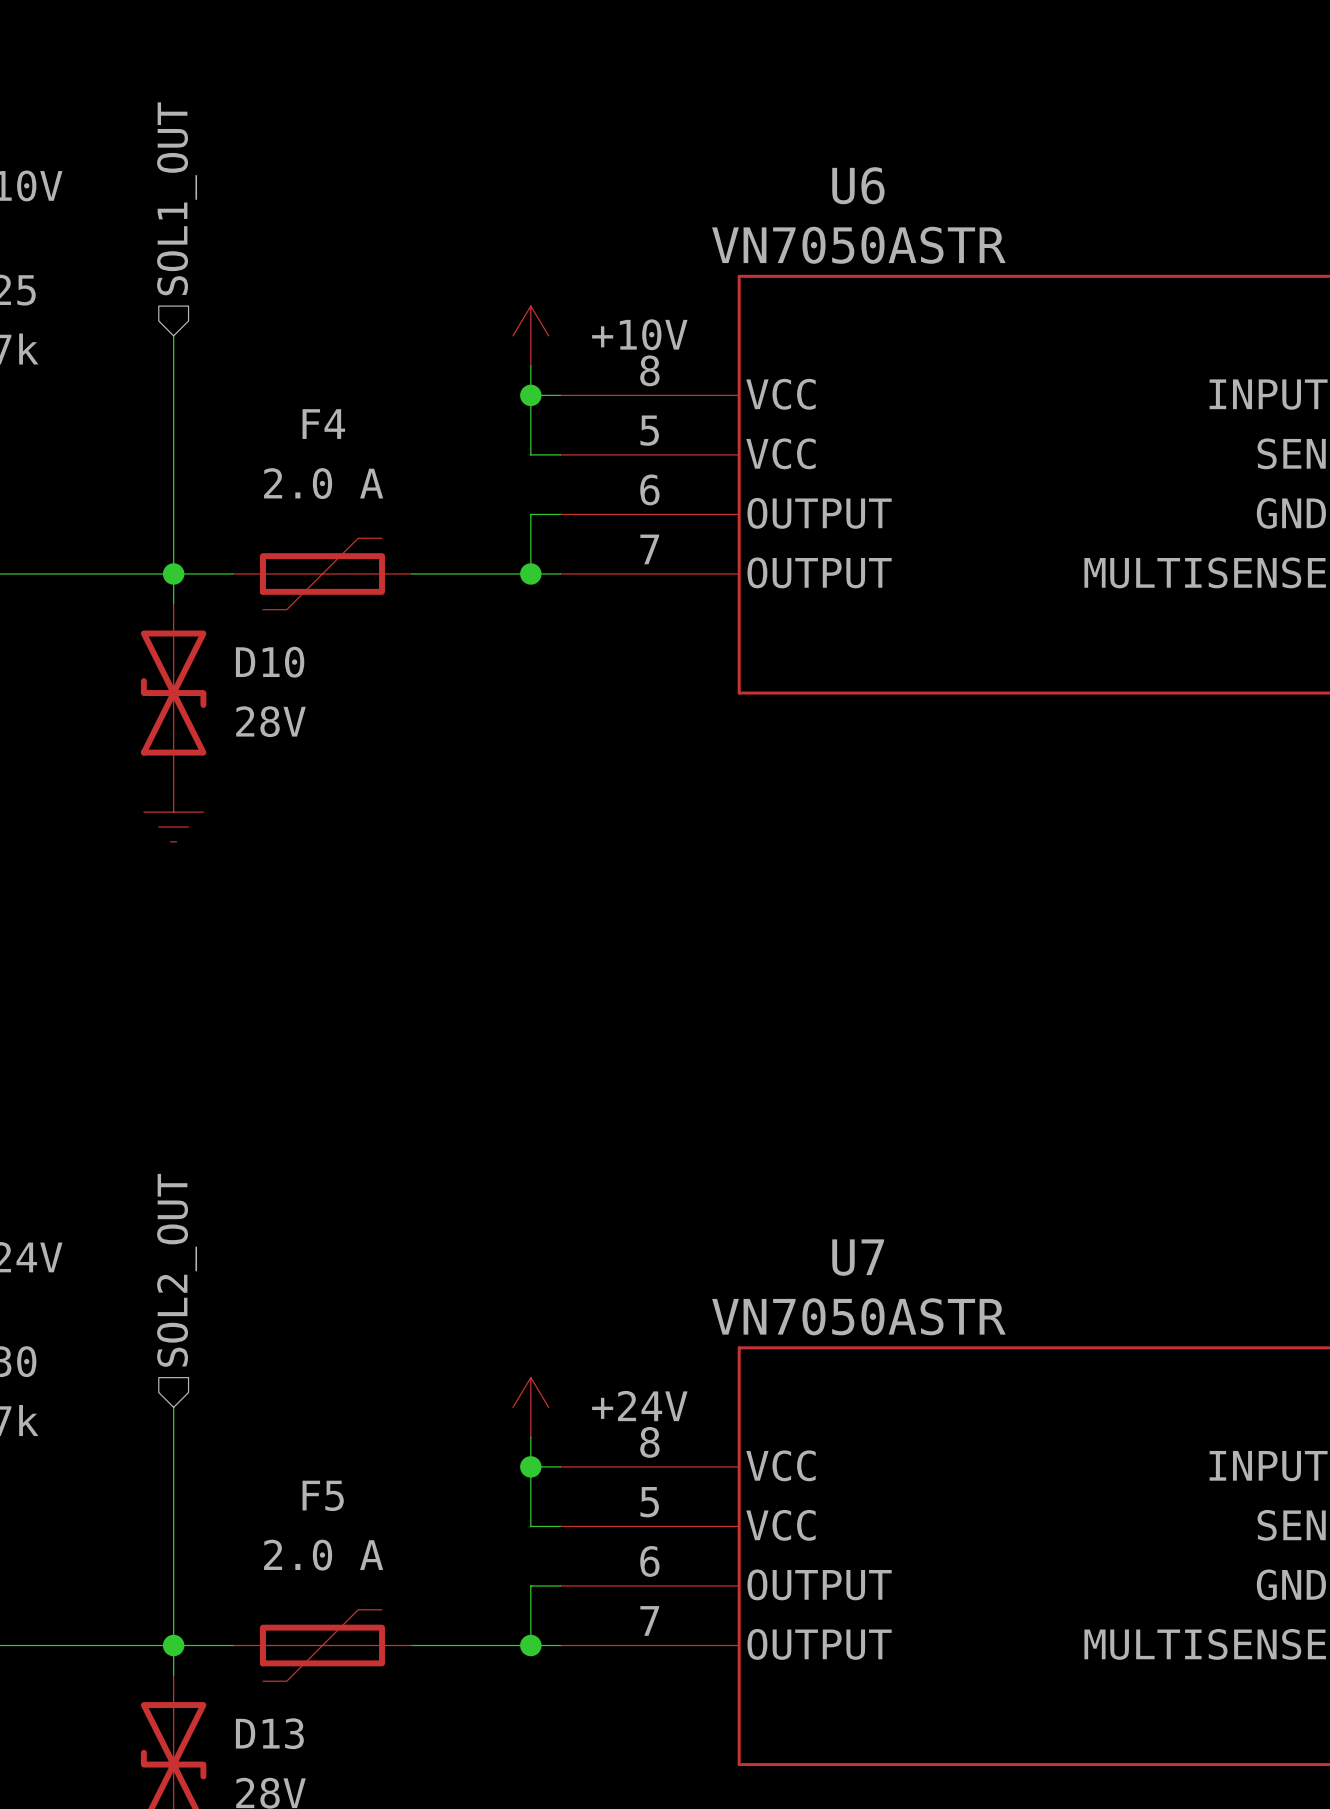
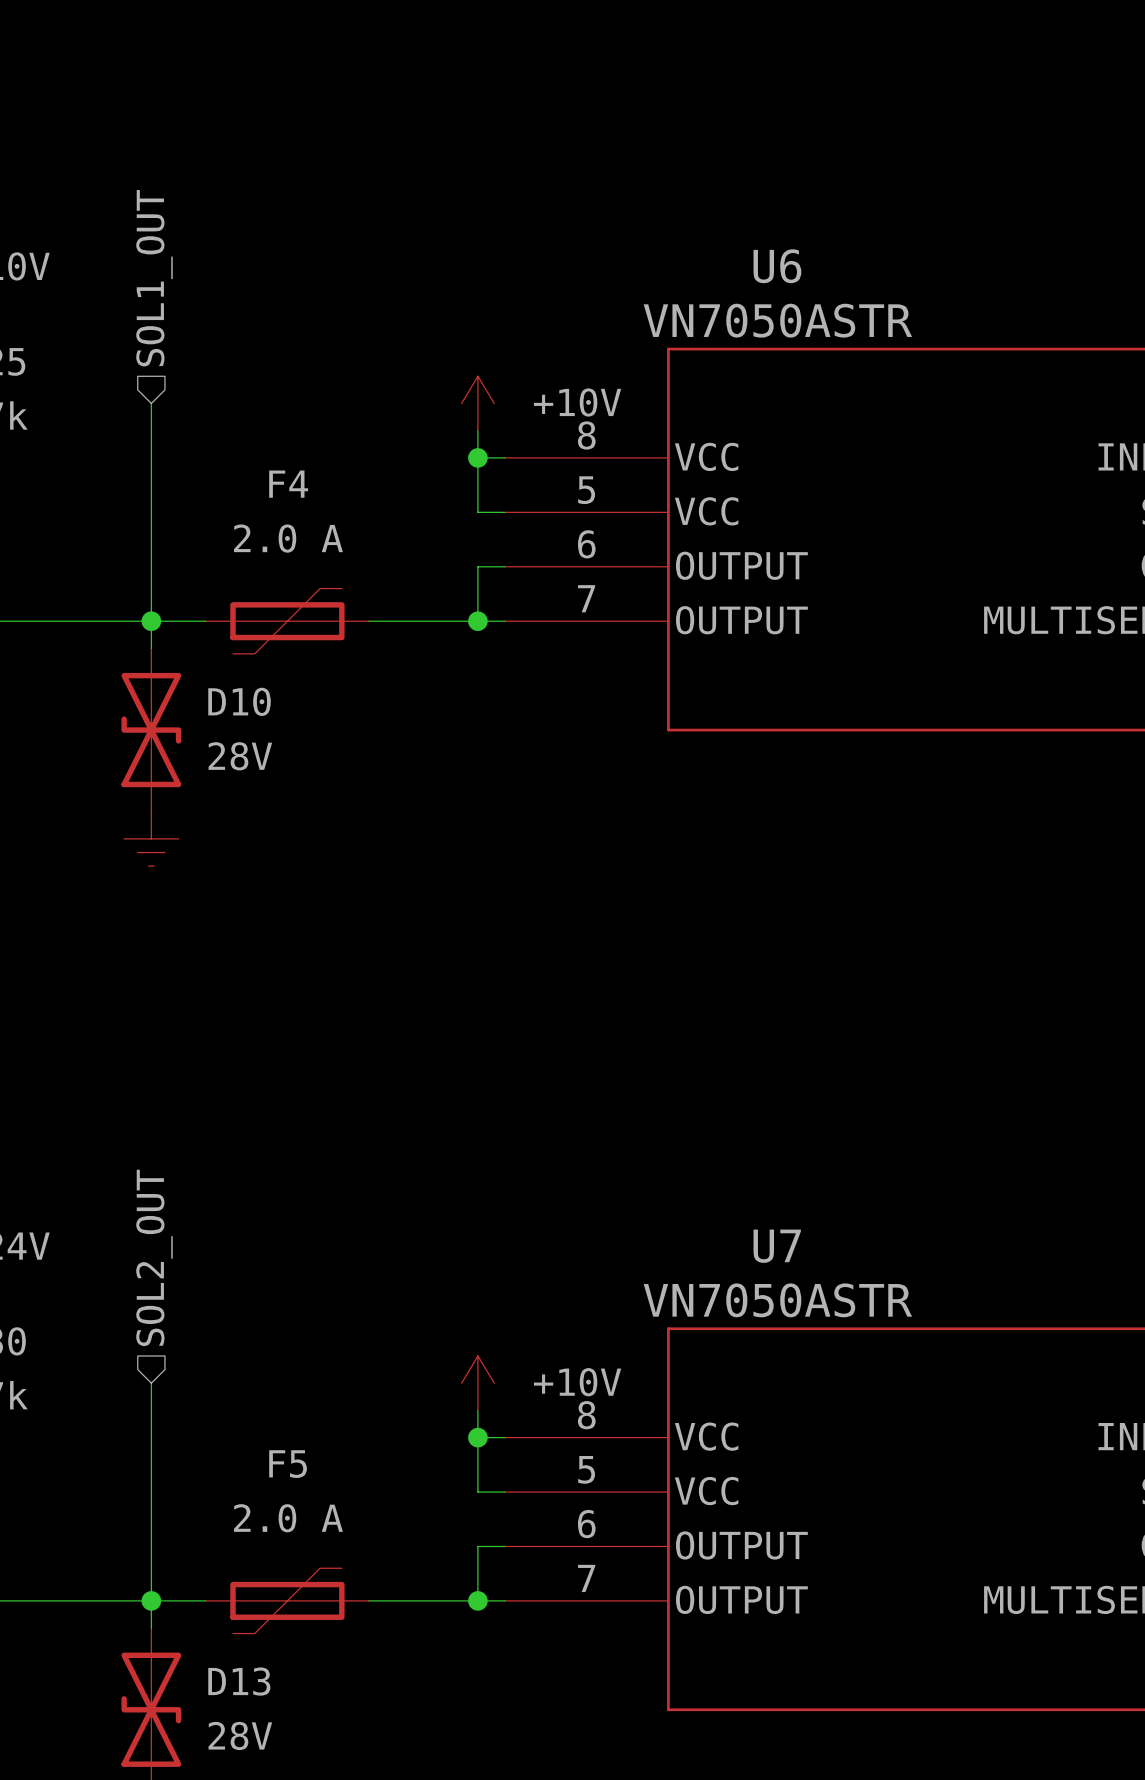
power symbol: +24V (530, 1407) -> +10V (477, 1383)

